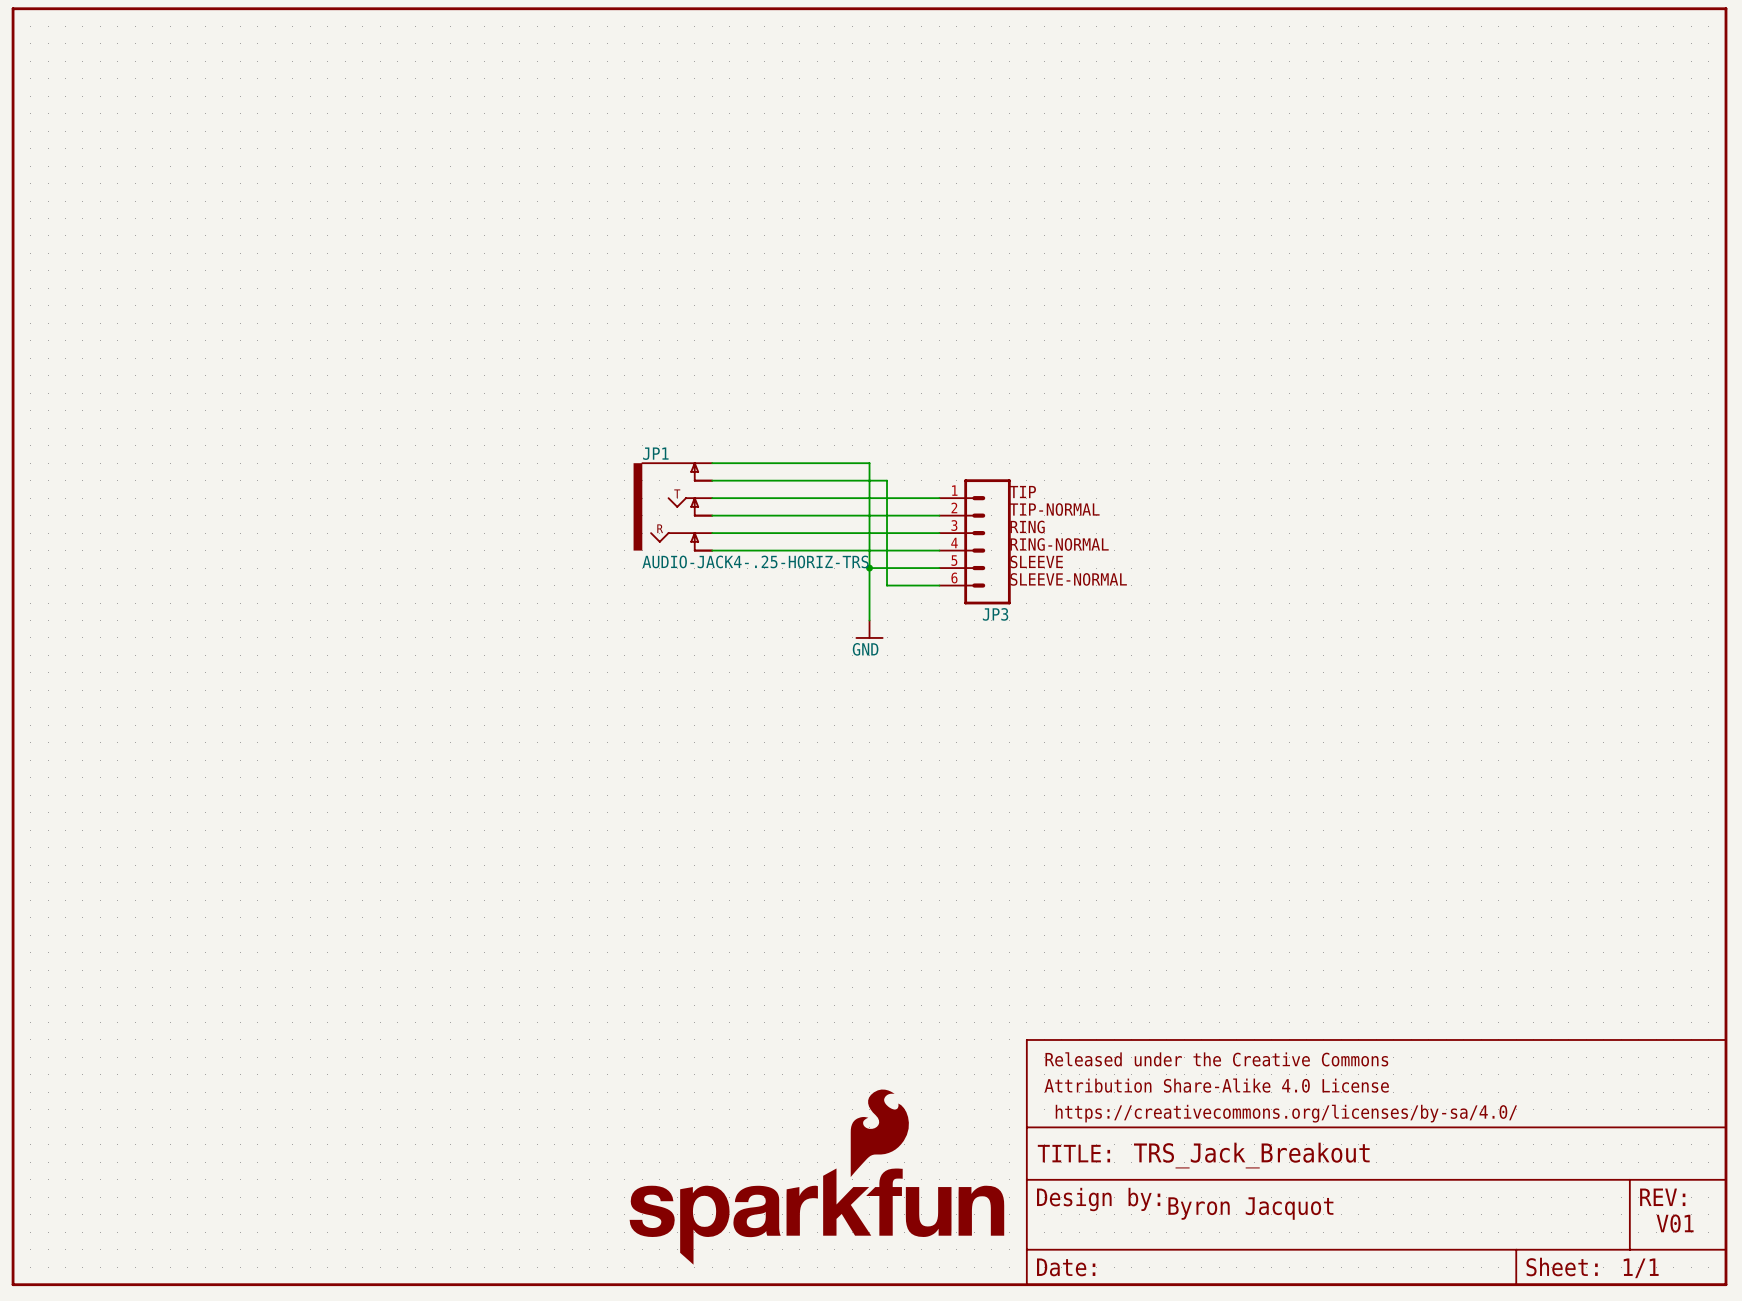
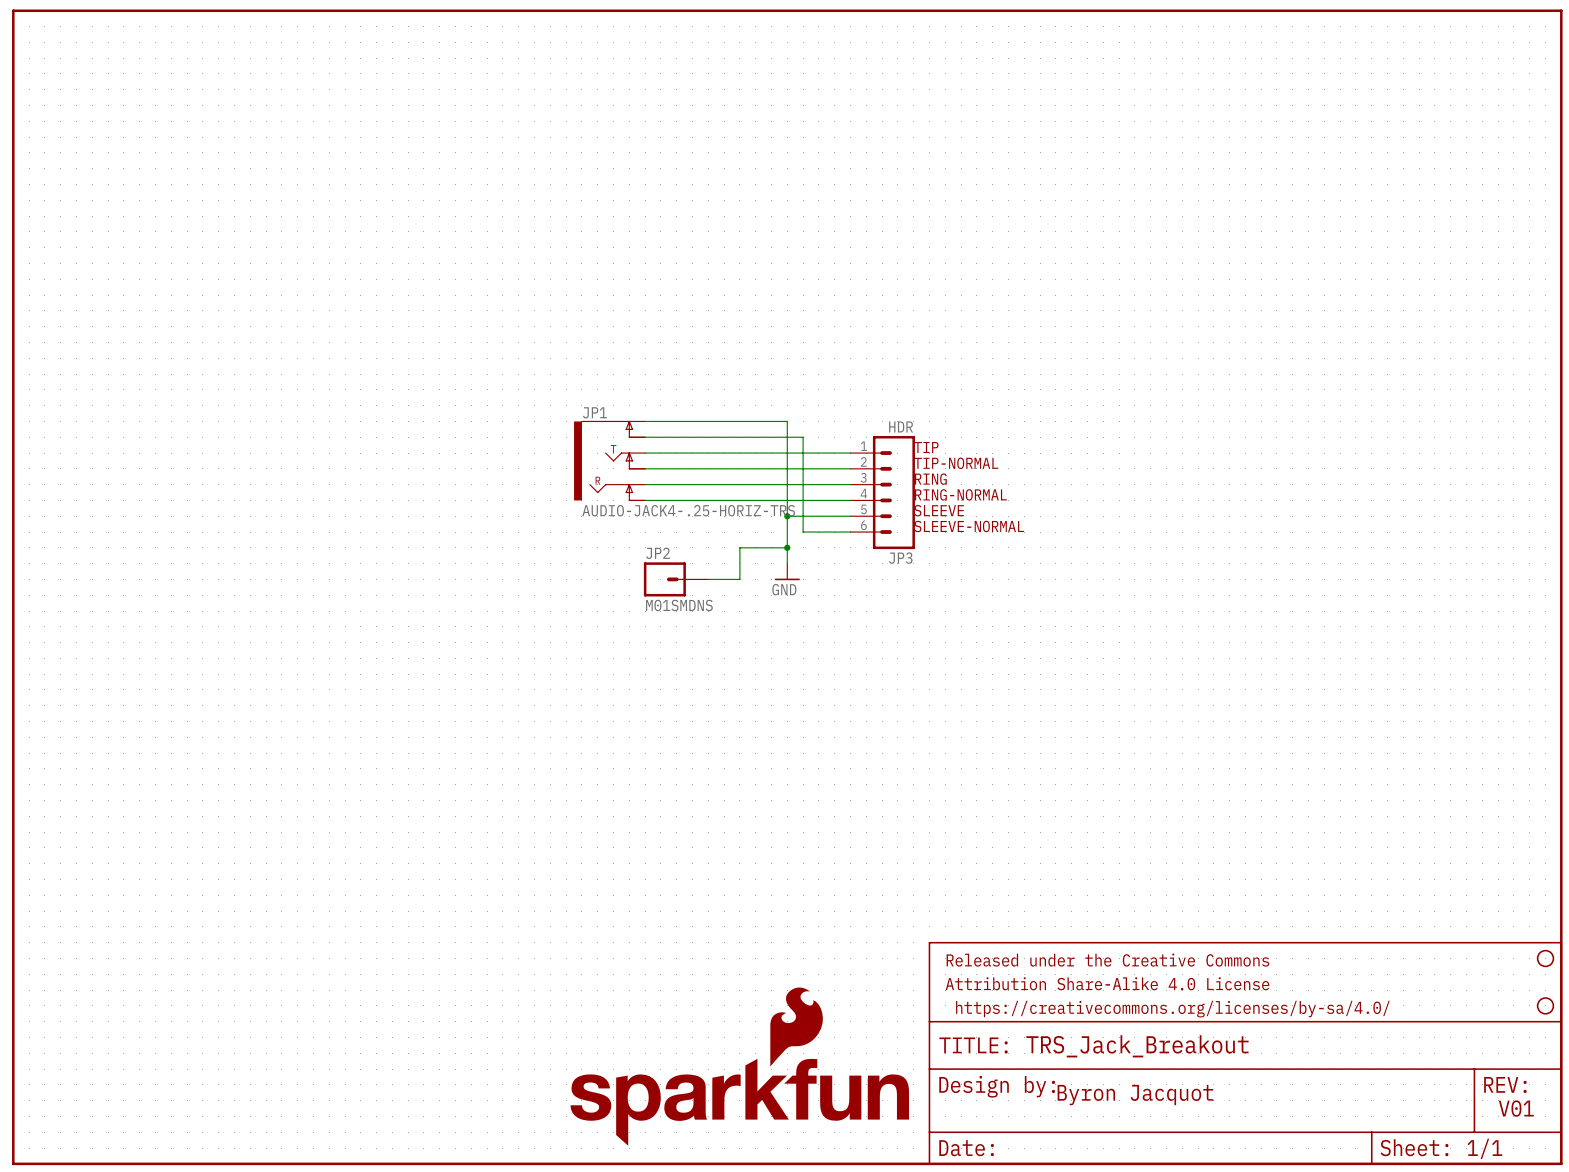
JP3 value: none -> HDR (901, 426)
wire: none -> (787, 547) (739, 547) (739, 579) (708, 579)
junction: none -> (787, 547)
JP2: none -> M01SMDNS (676, 579)
part: none -> (1545, 958)
part: none -> (1545, 1005)

